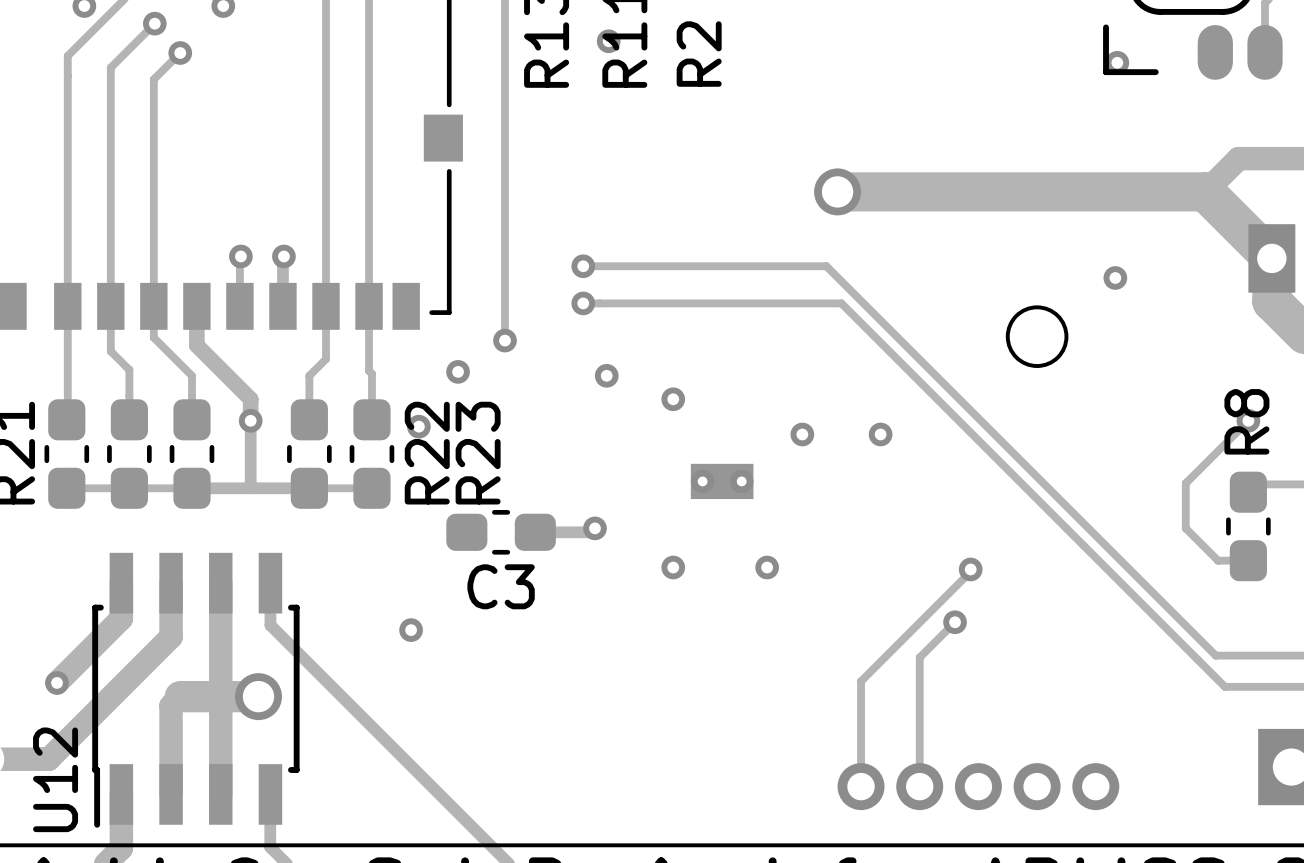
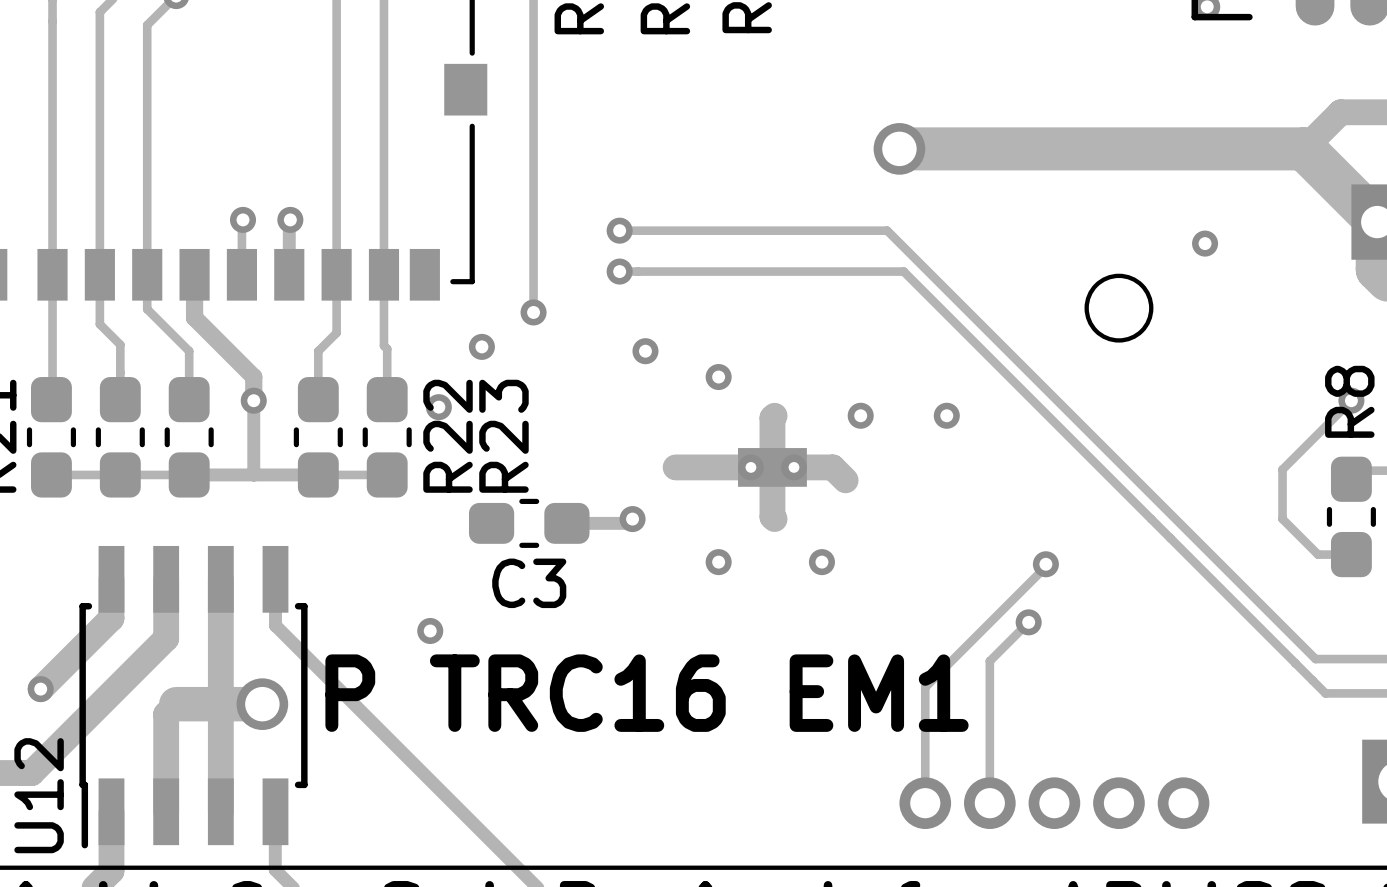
track: none -> (774, 415) (772, 417) (772, 516) (774, 519) (772, 521) (772, 467)
track: none -> (675, 467) (832, 467) (845, 480)
text: none -> P TRC16 EM1 (647, 693)

